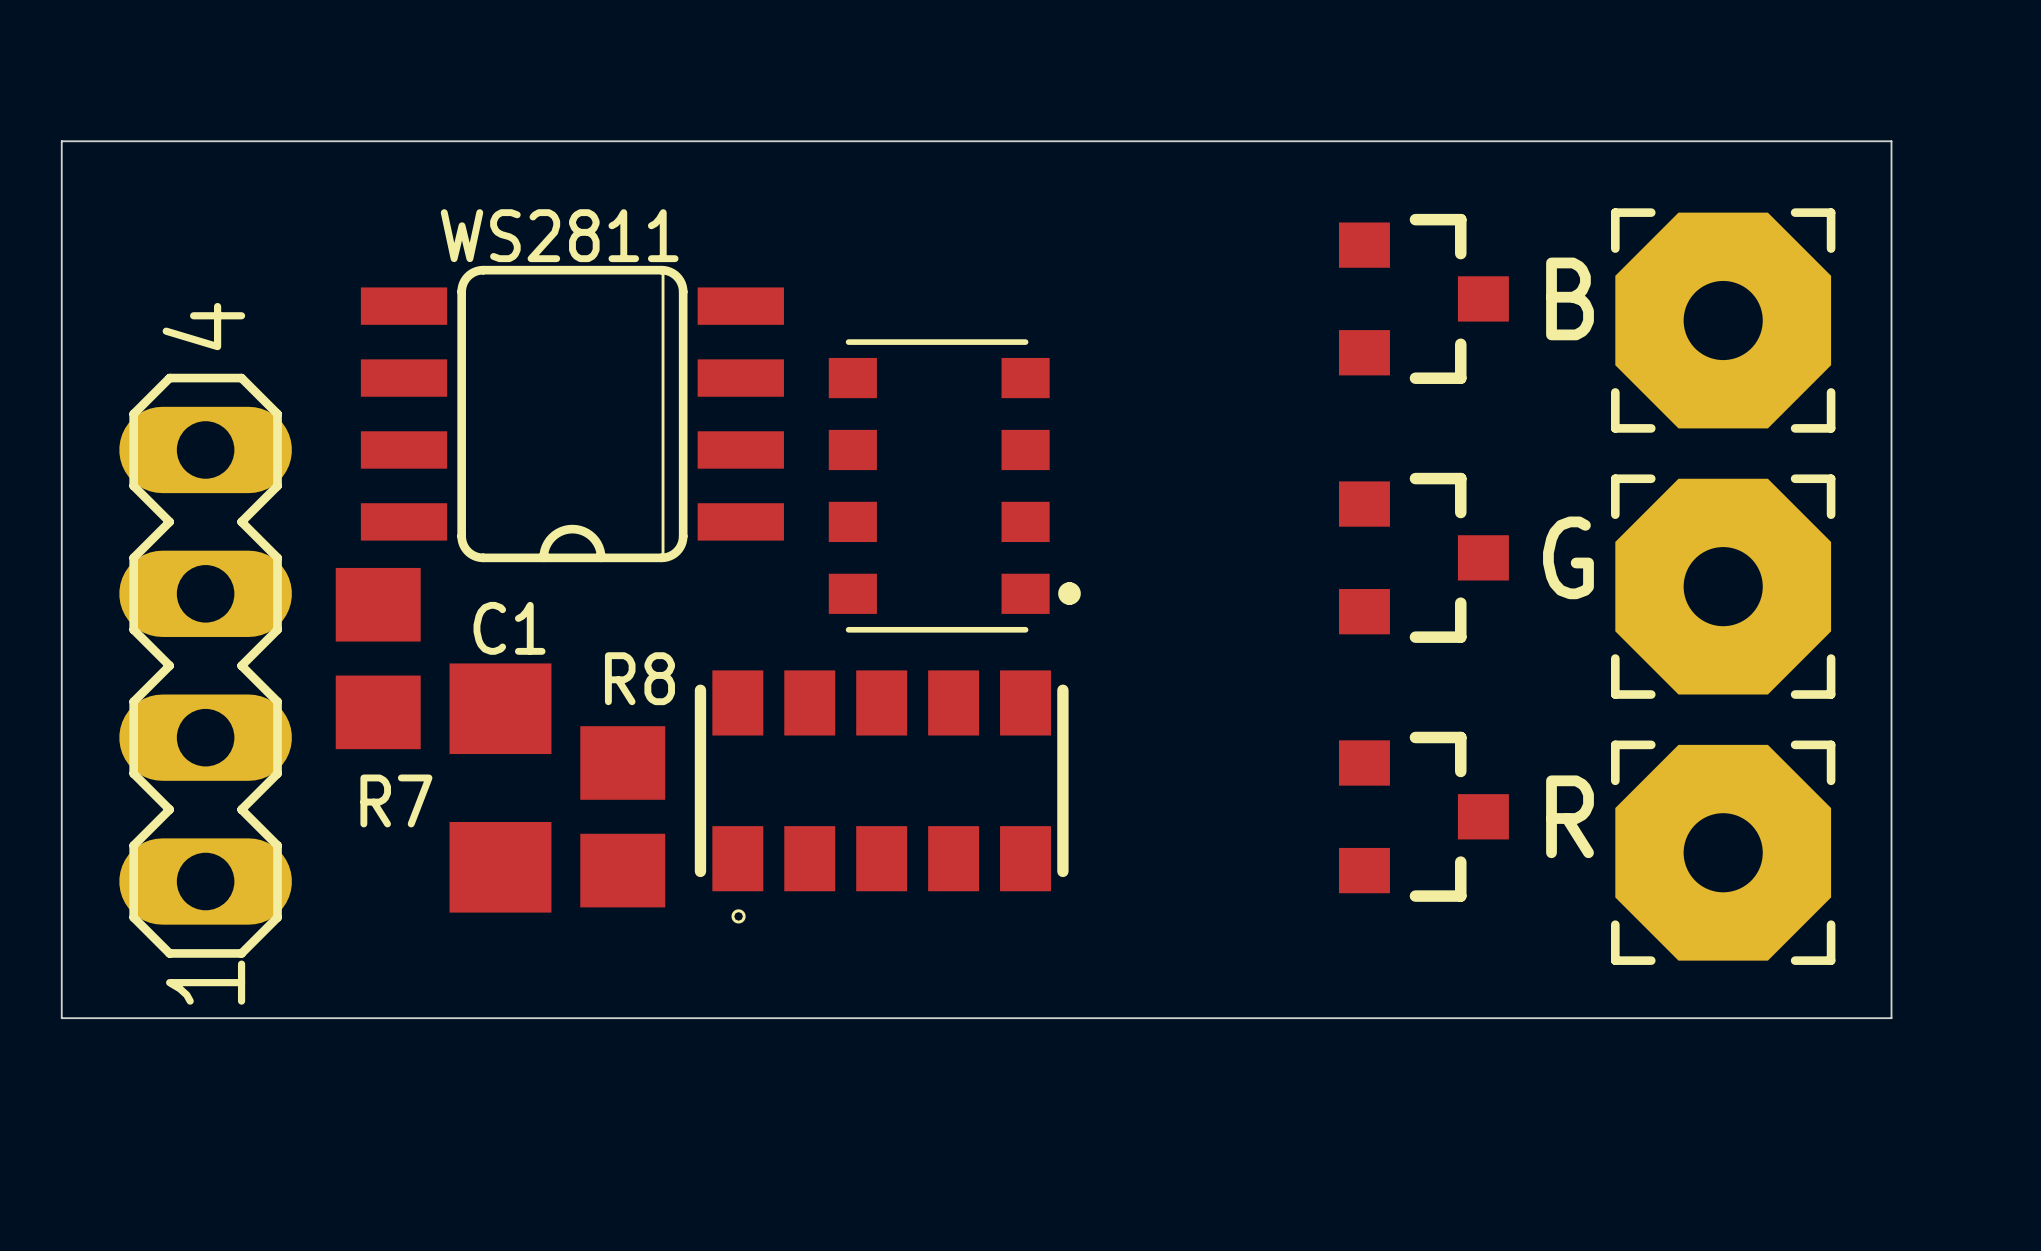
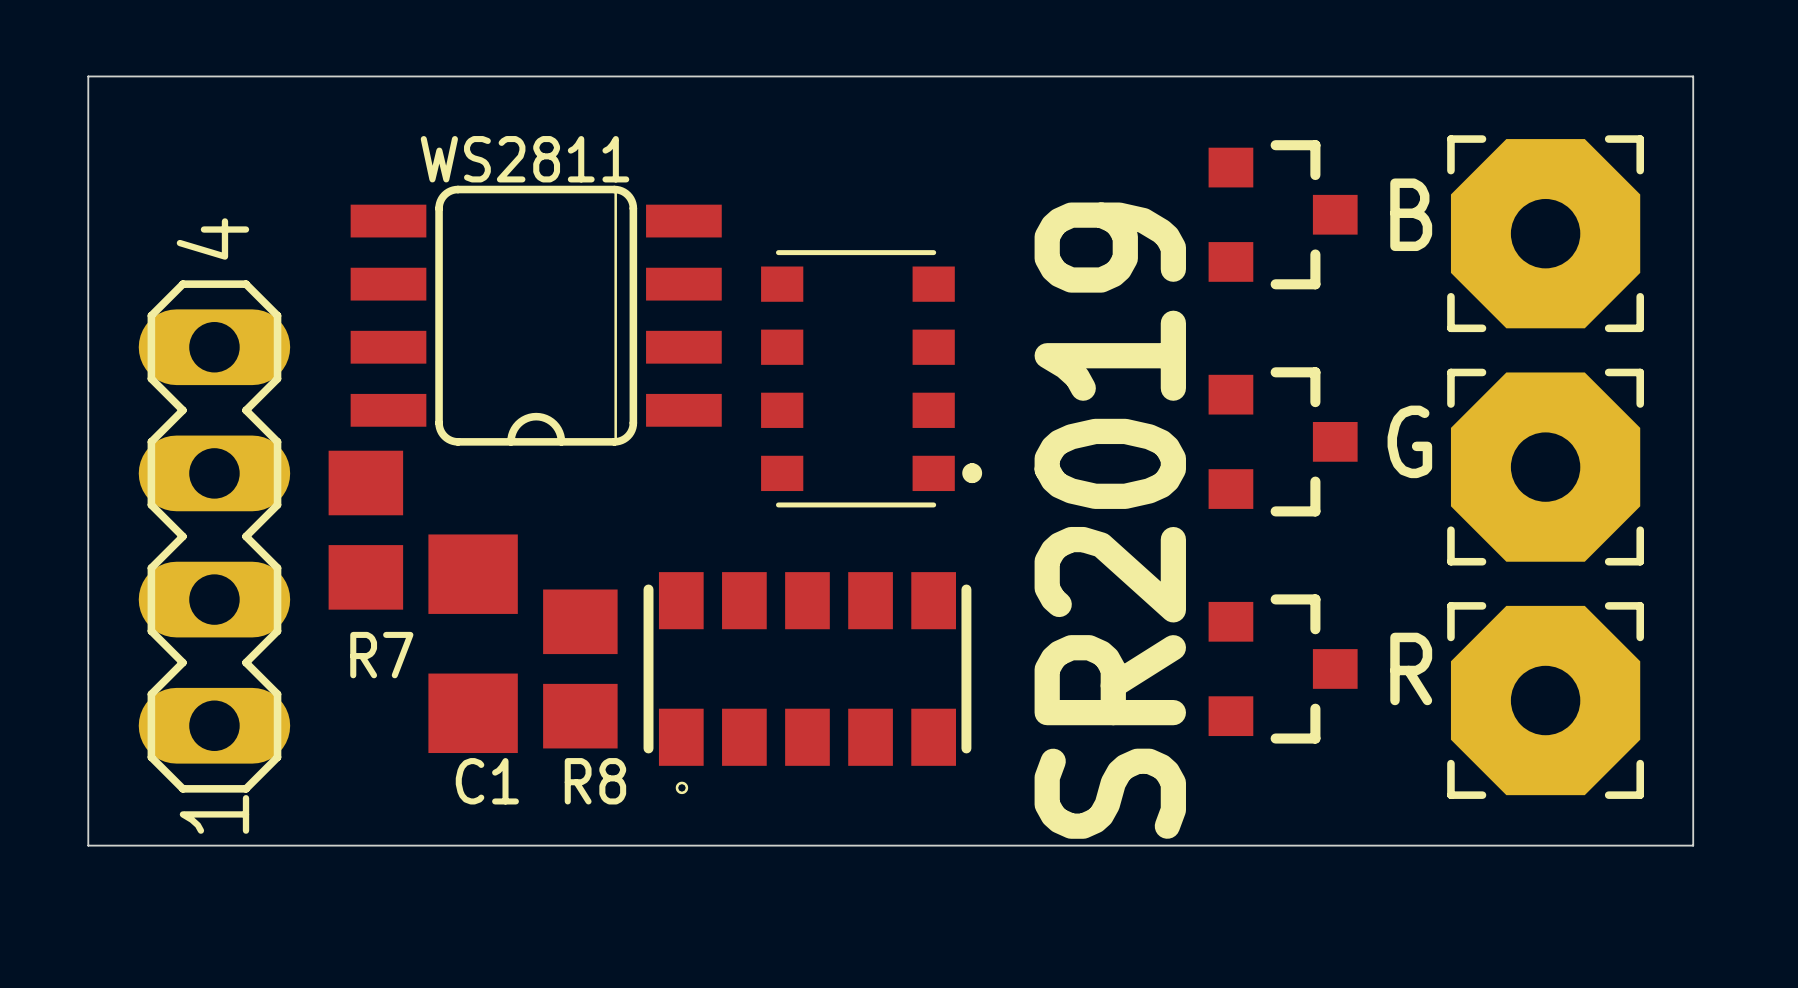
text position: C1 (509, 628) -> C1 (487, 781)
text: none -> SR2019 (1110, 520)
text position: R8 (639, 678) -> R8 (595, 781)
part position: (881, 796) -> (807, 683)

